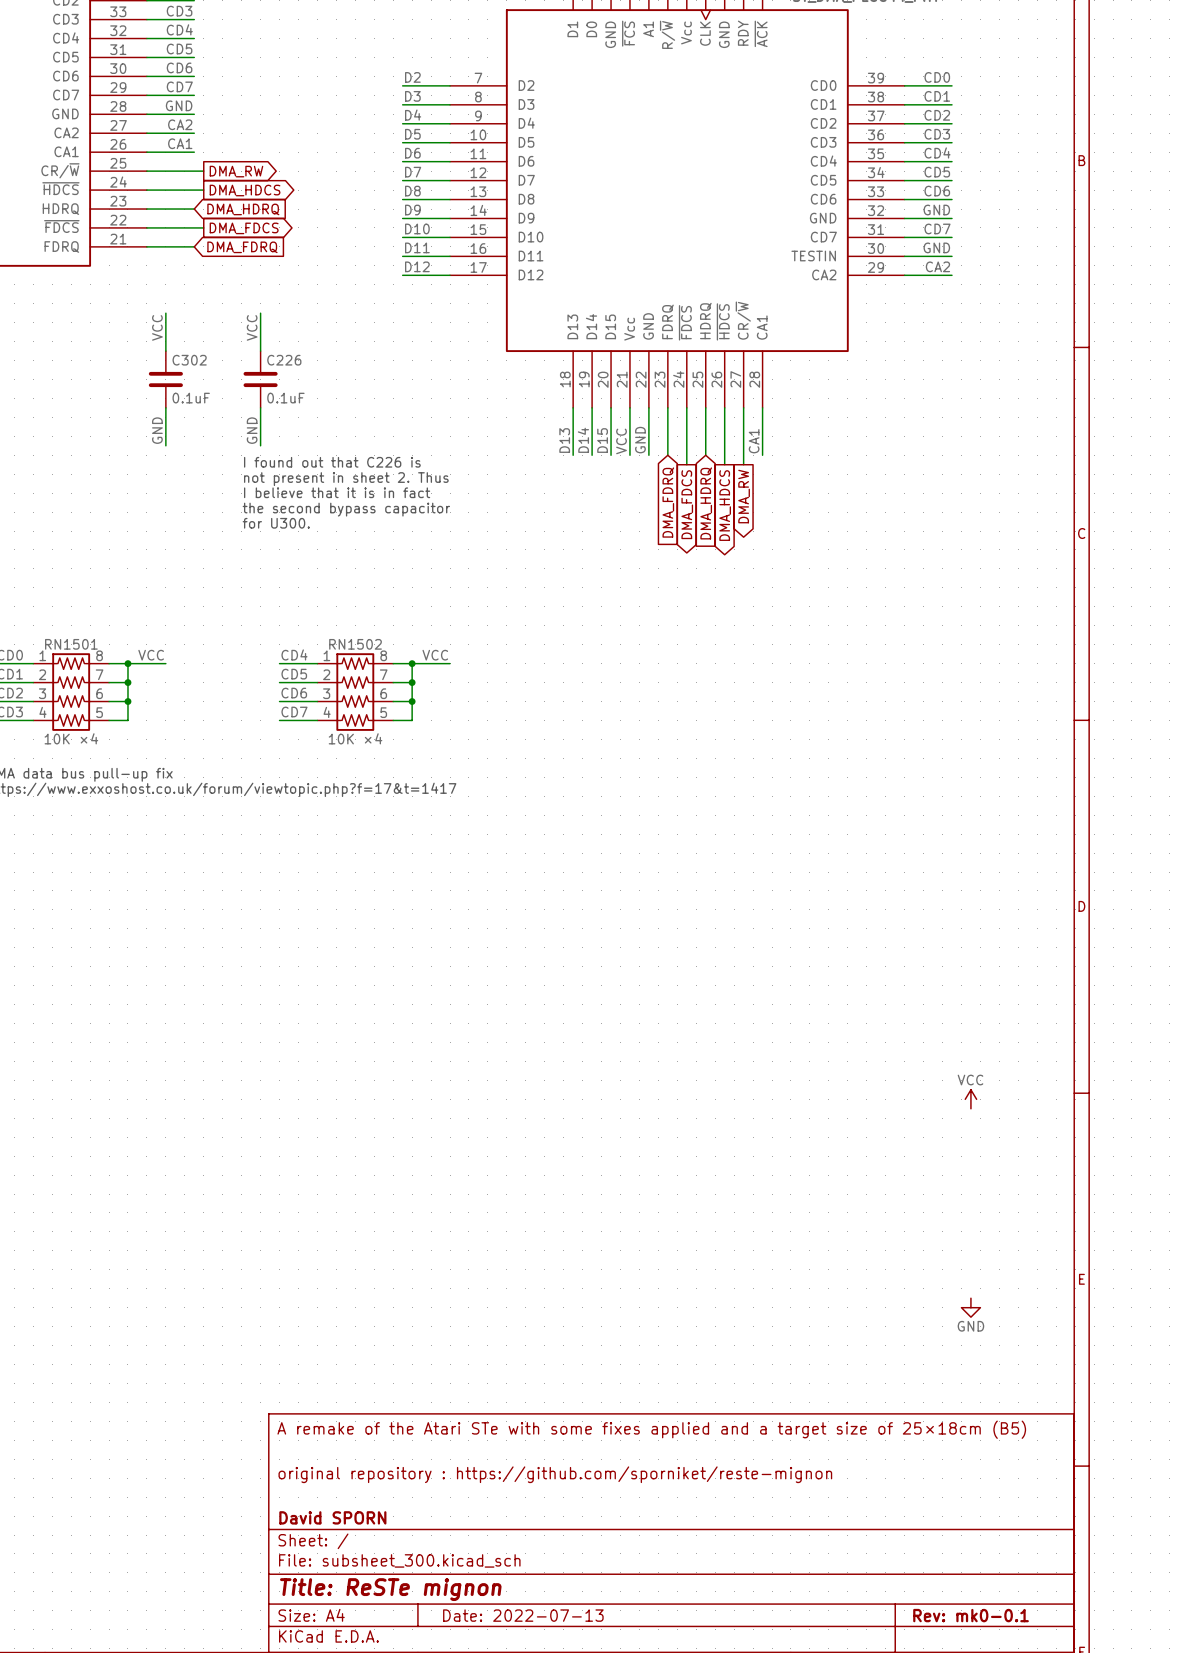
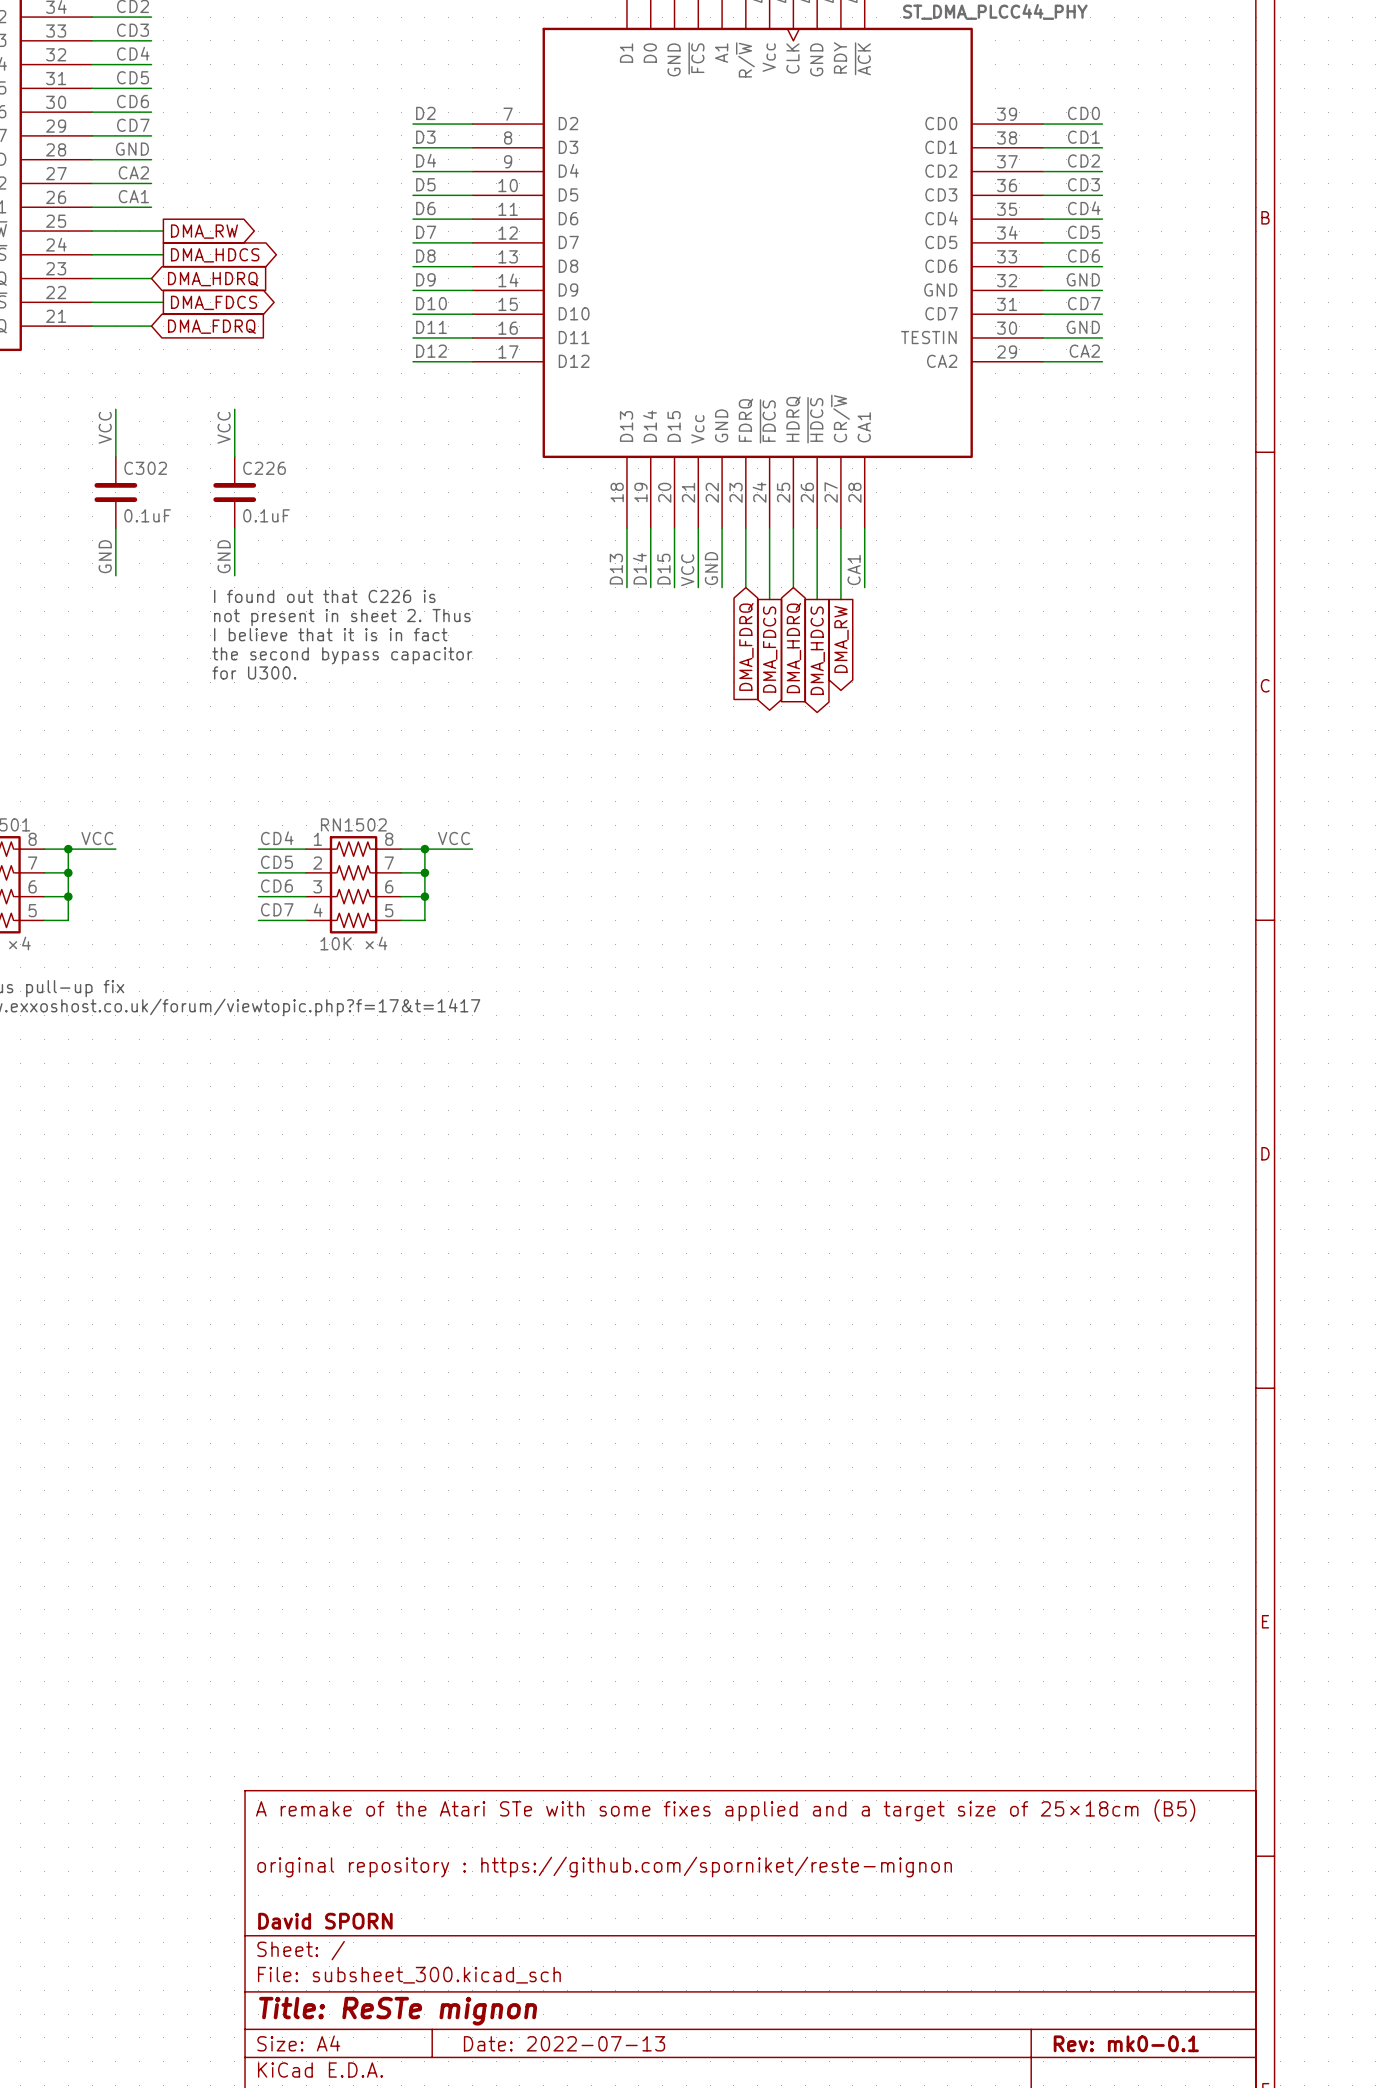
power symbol: VCC (970, 1099) -> none
power symbol: GND (970, 1307) -> none

